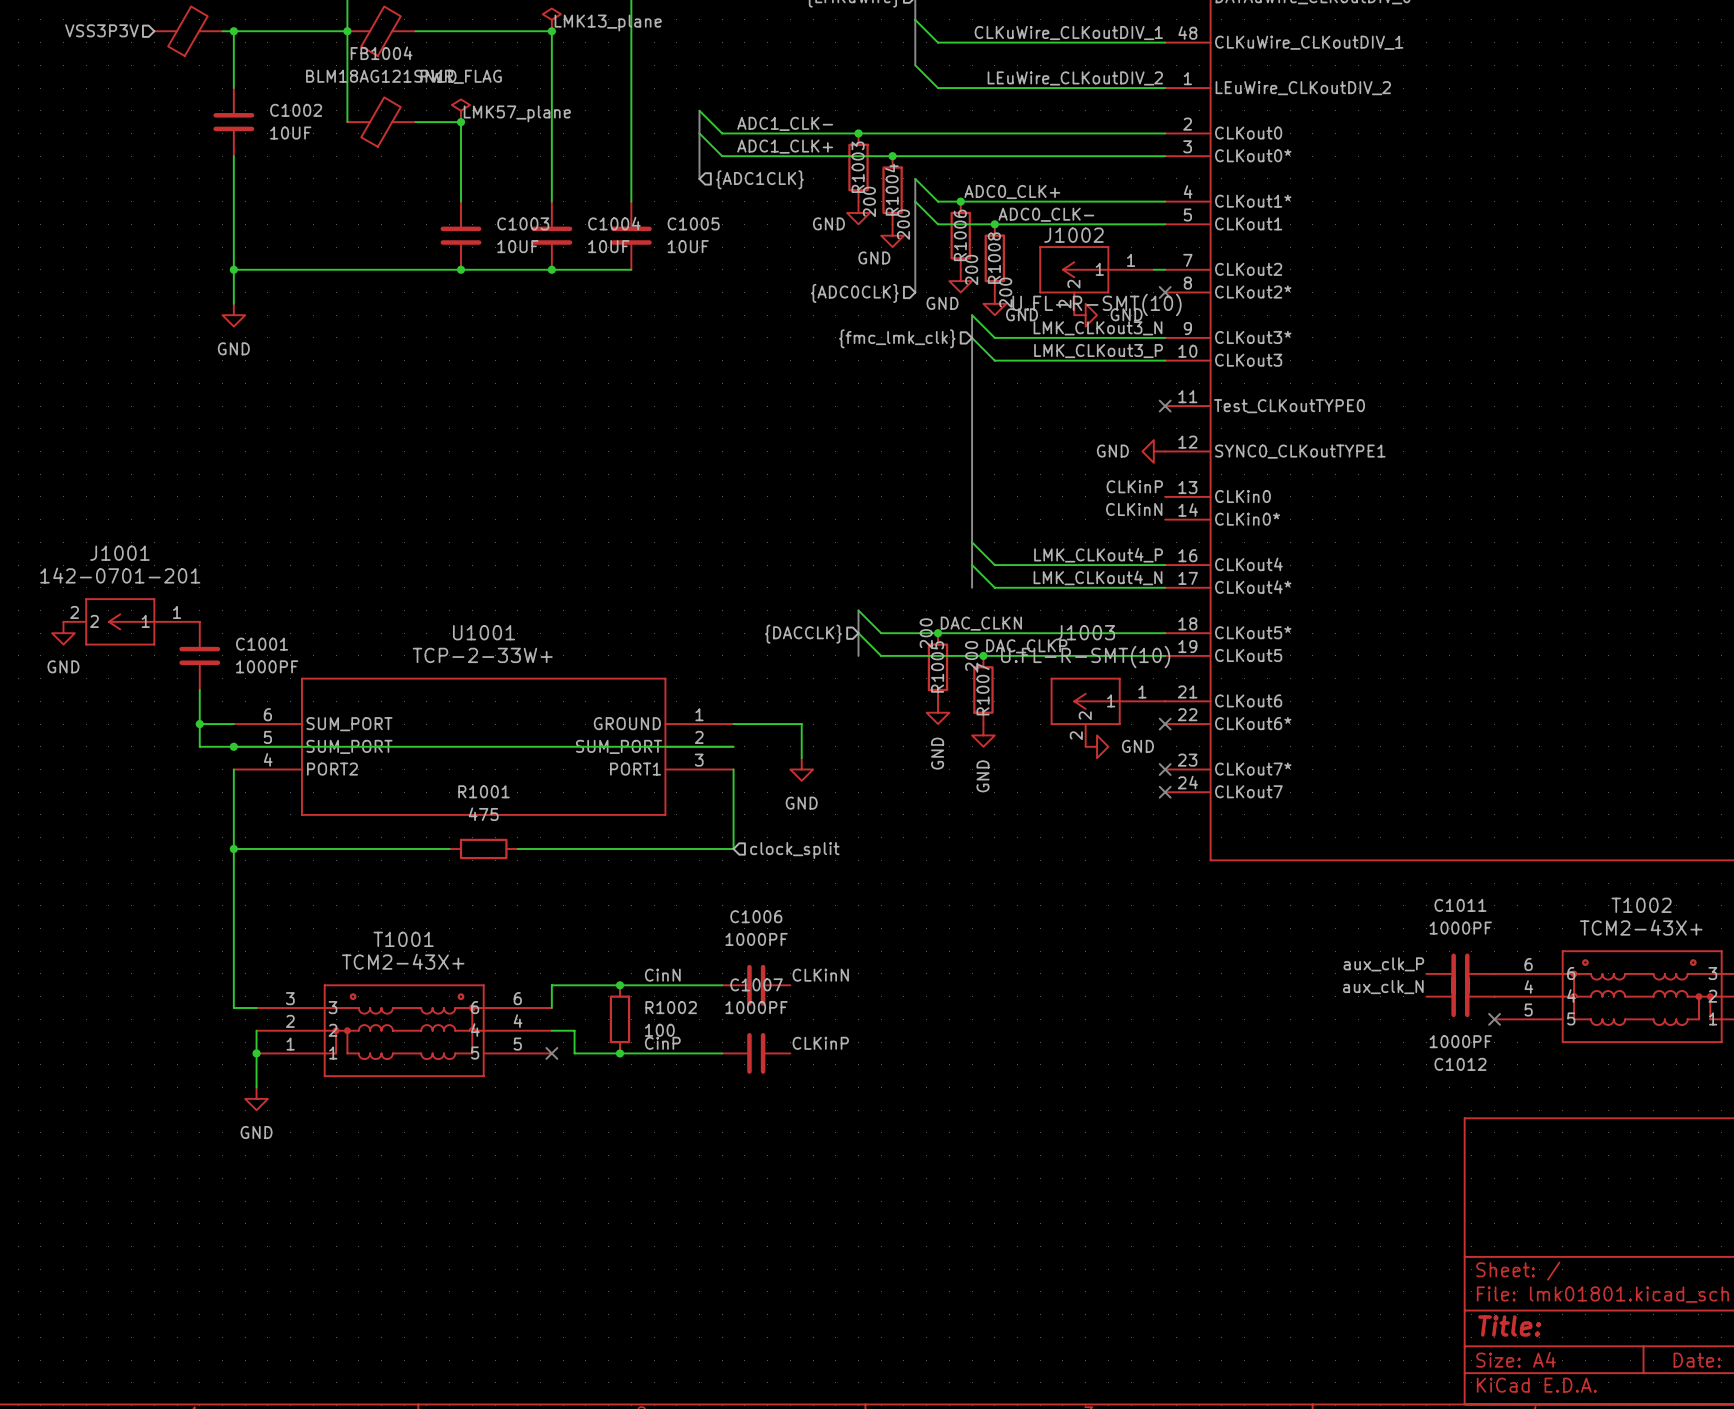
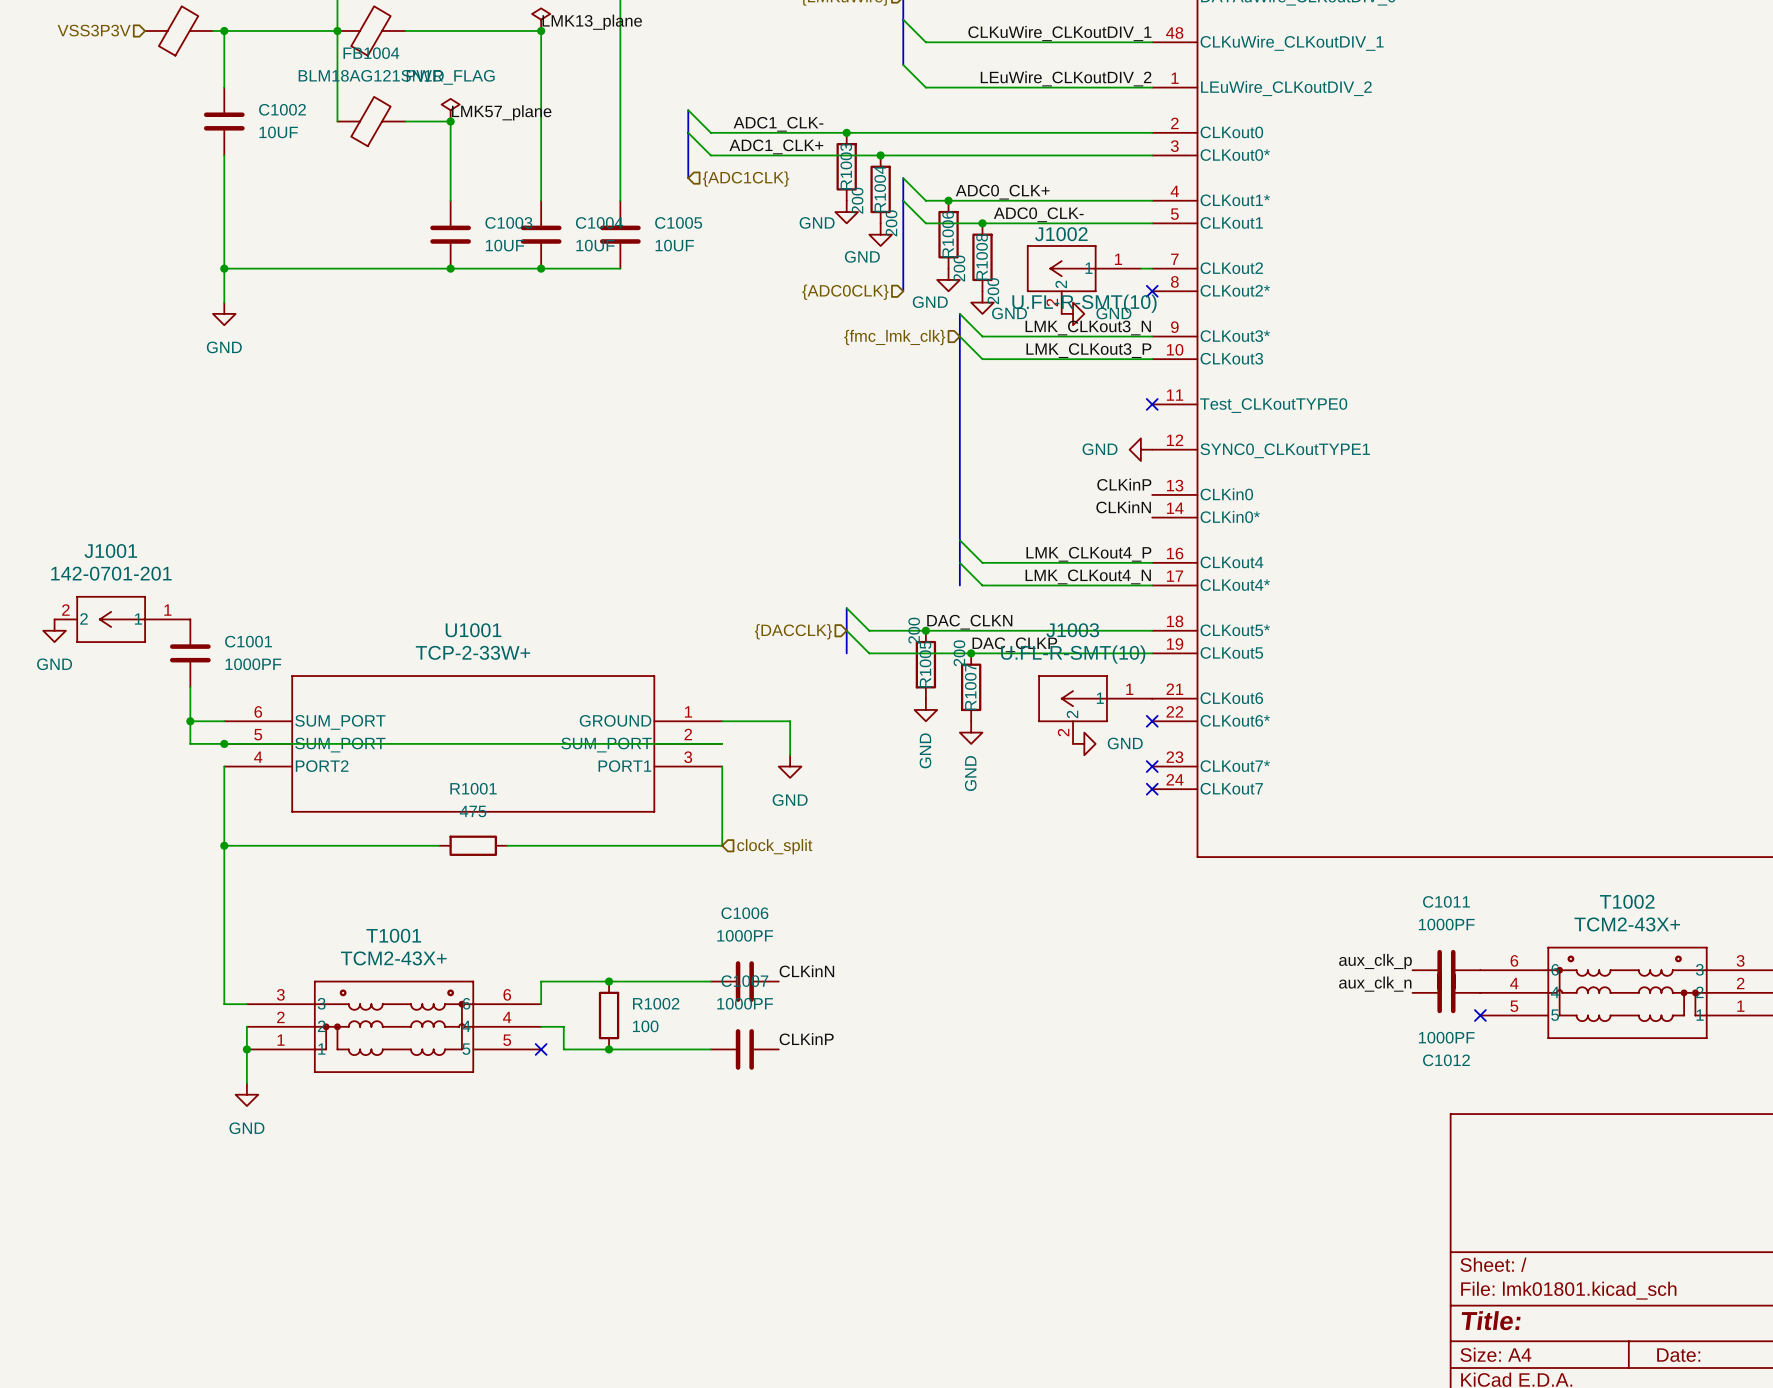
label: aux_clk_P (1383, 964) -> aux_clk_p (1375, 961)
label: CinN (662, 975) -> none
label: aux_clk_N (1383, 987) -> aux_clk_n (1375, 984)
label: CinP (662, 1043) -> none

